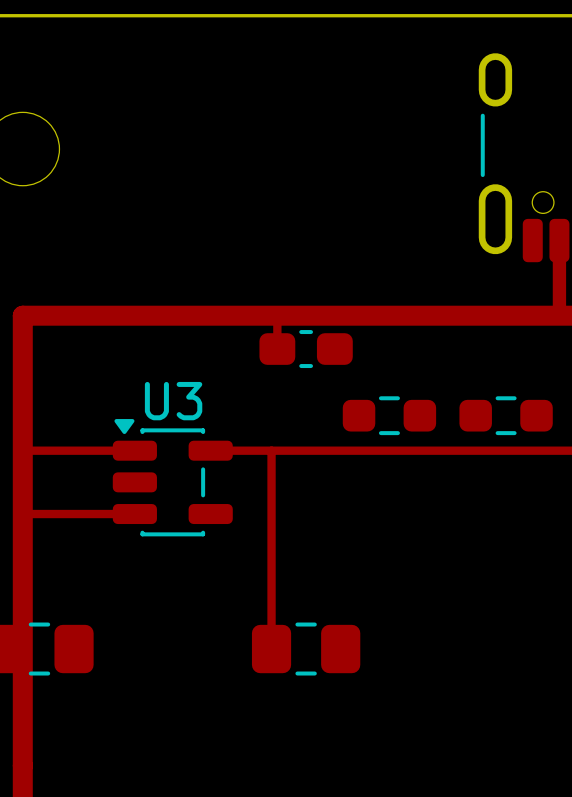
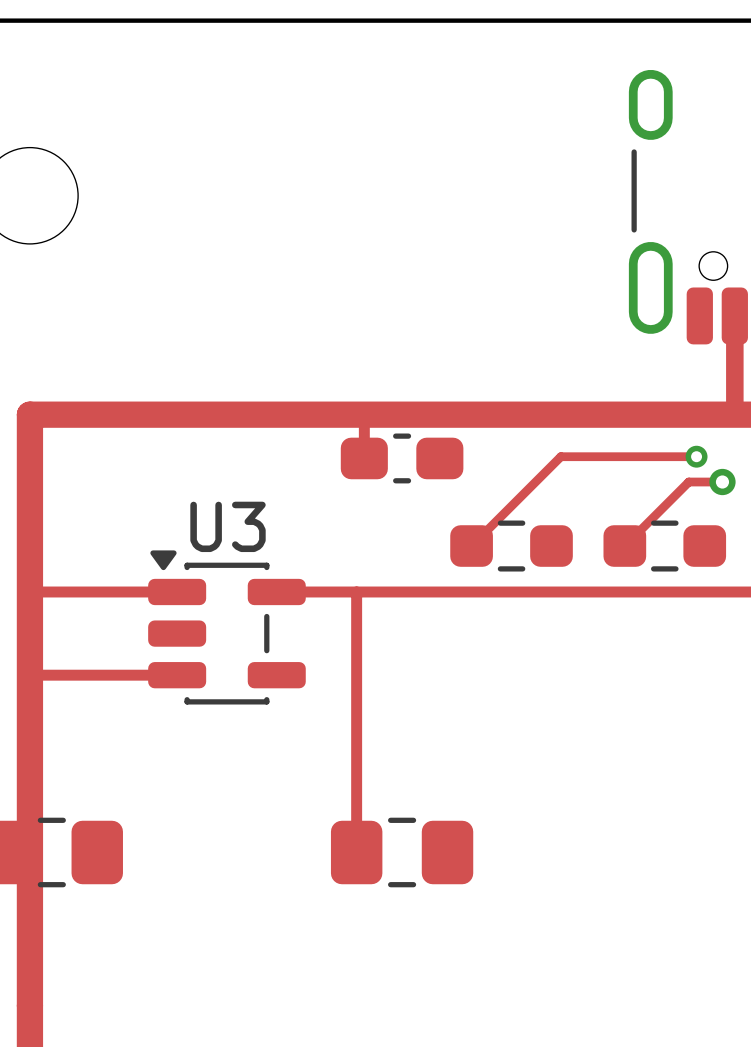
track: none -> (696, 456) (560, 456) (471, 546)
via: none -> (696, 456)
track: none -> (722, 482) (688, 482) (624, 546)
via: none -> (722, 482)

